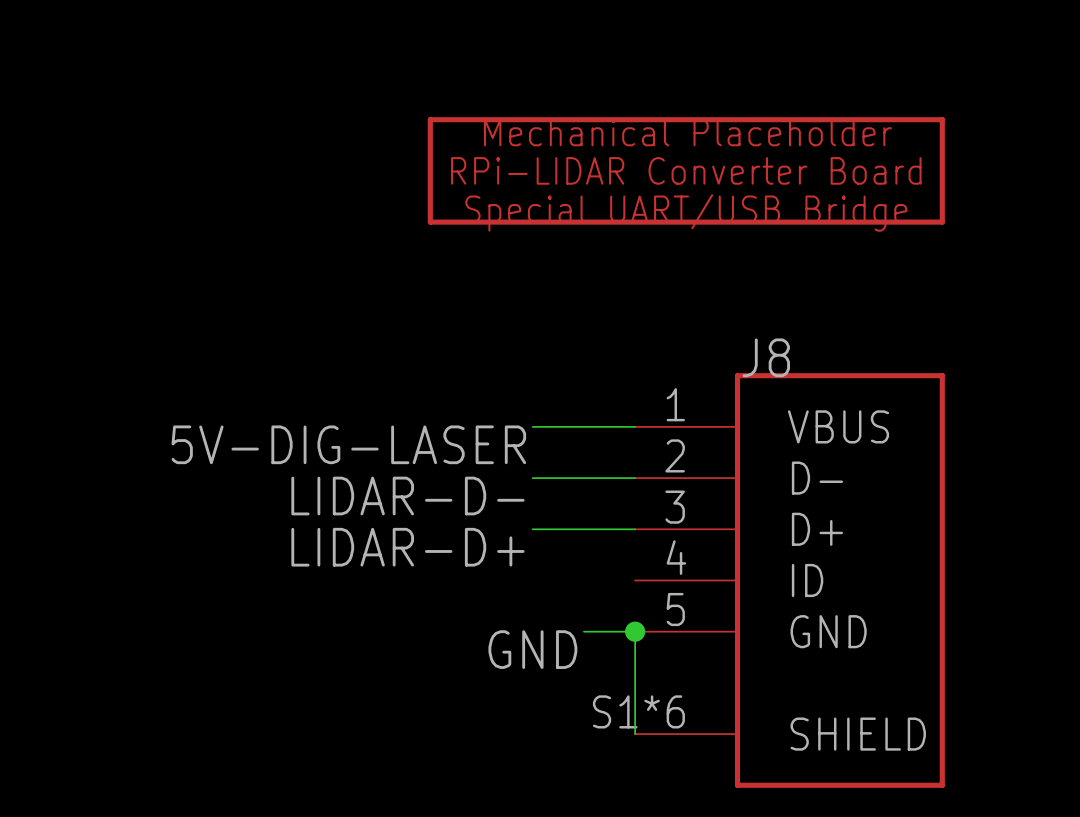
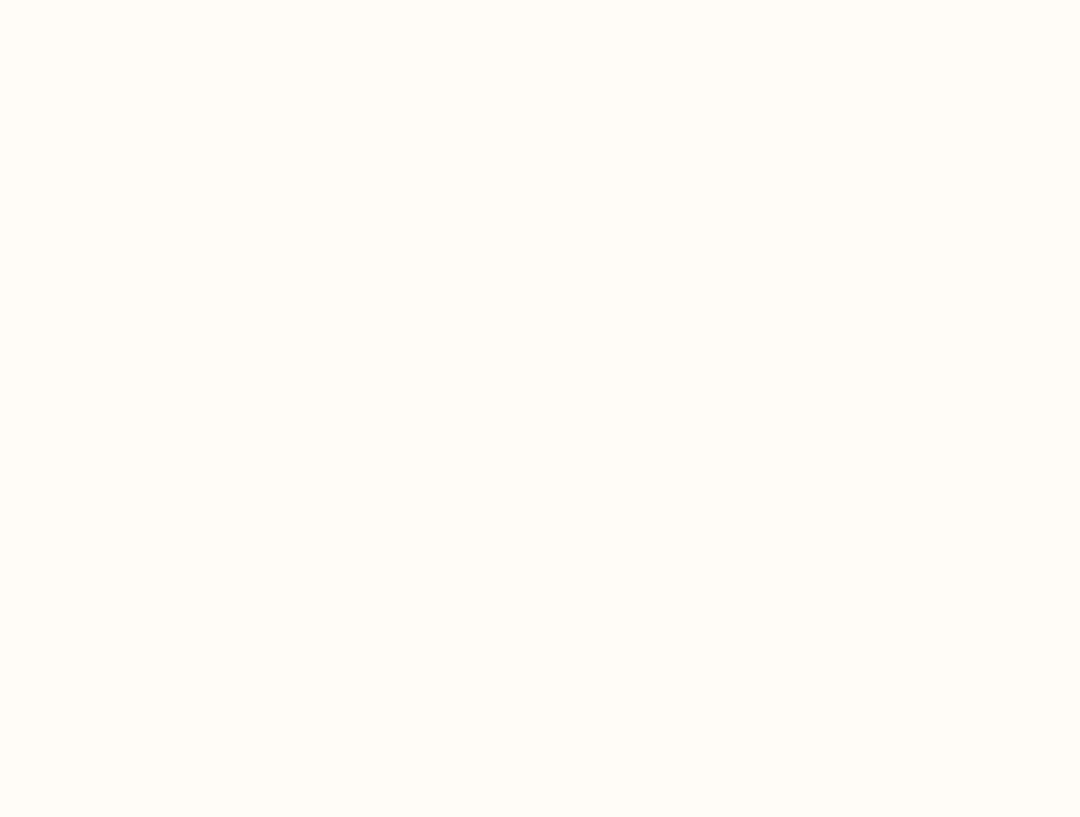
part: (686, 170) -> none
wire: (532, 426) (635, 426) -> none
label: 5V-DIG-LASER (348, 444) -> none
wire: (532, 478) (635, 478) -> none
label: LIDAR-D- (407, 496) -> none
wire: (532, 529) (635, 529) -> none
label: LIDAR-D+ (407, 547) -> none
J8: (789, 580) -> none
wire: (583, 631) (635, 631) (635, 734) -> none
junction: (635, 631) -> none
label: GND (532, 649) -> none

